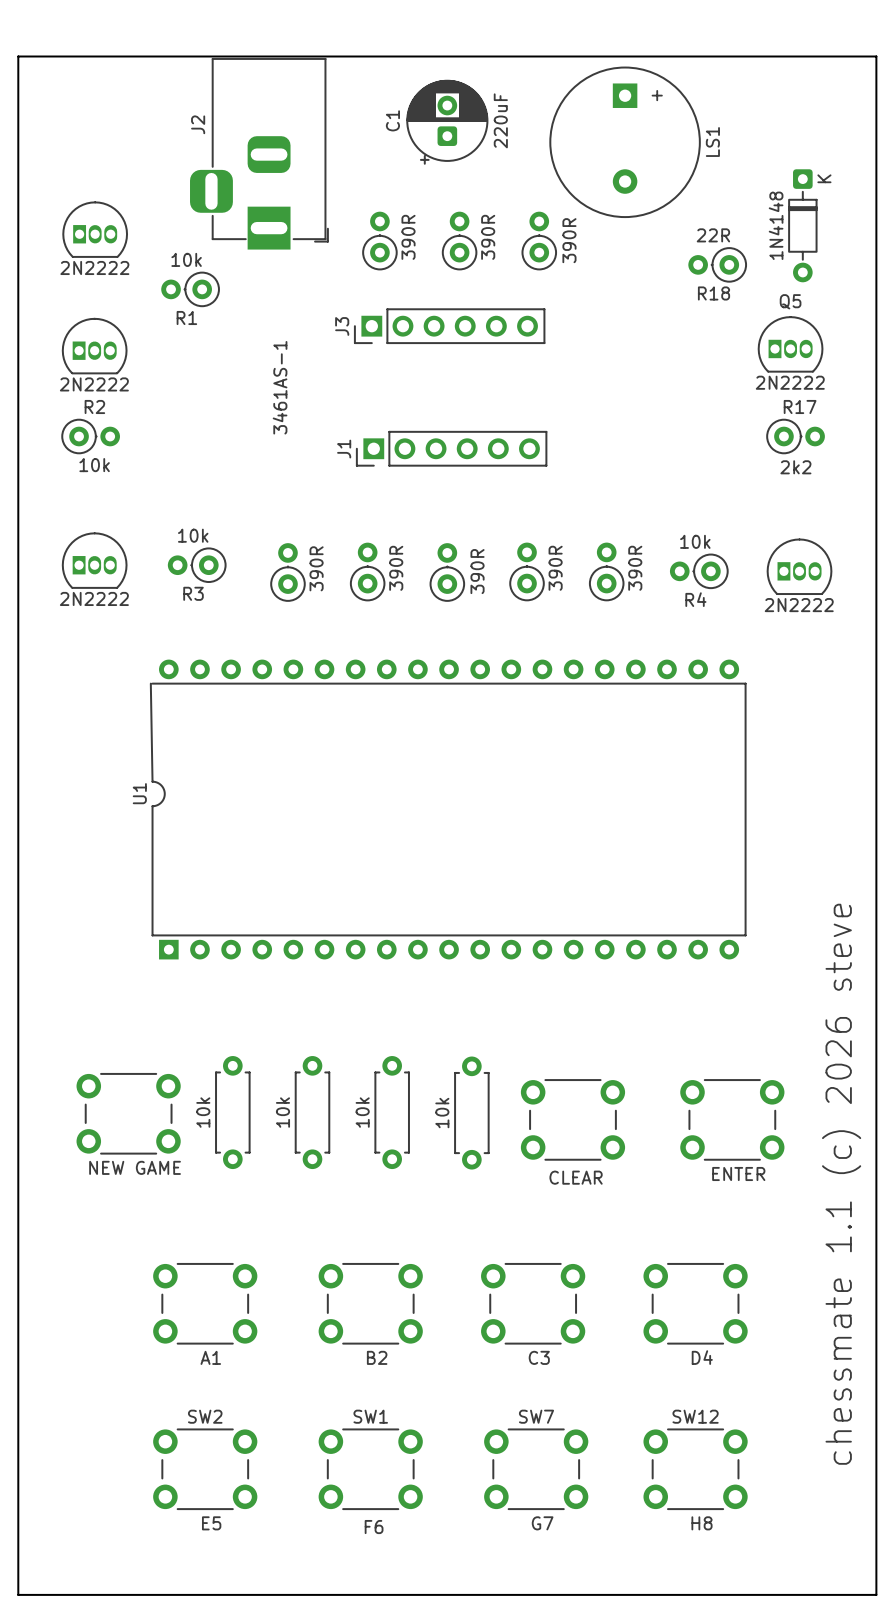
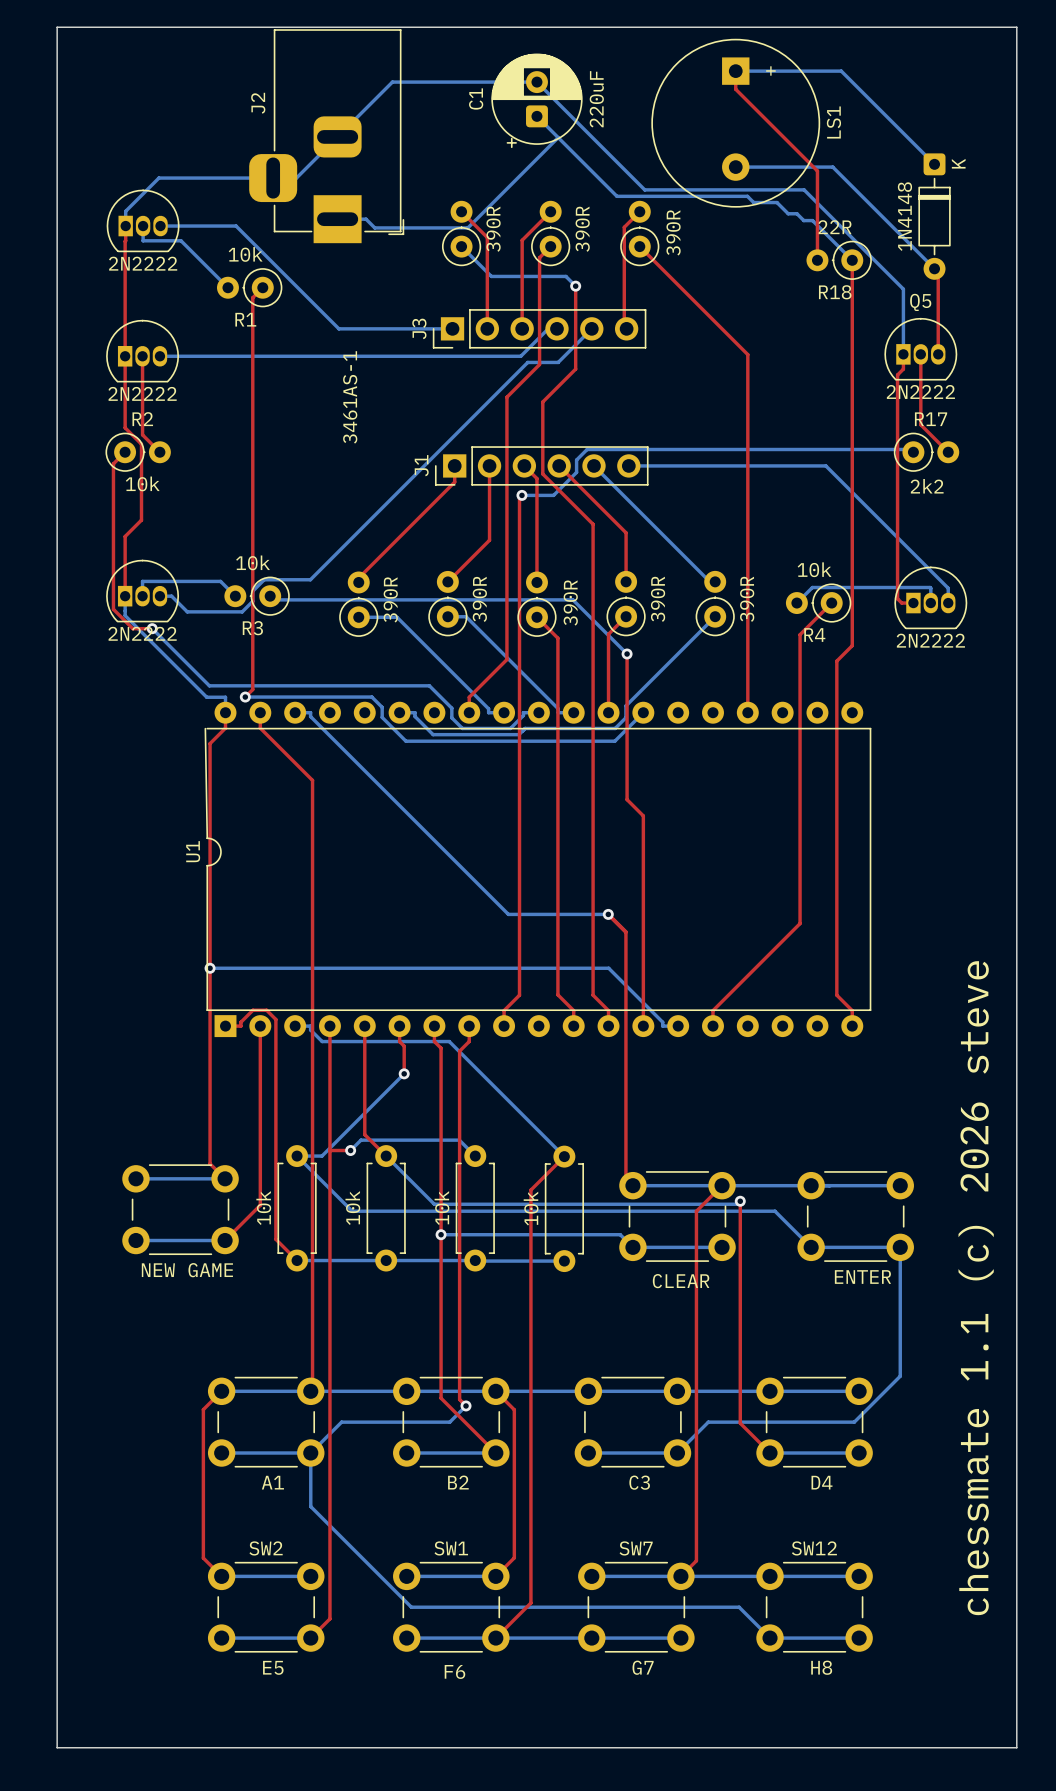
top track: none -> (735, 71) (735, 89) (817, 171) (817, 260)
bottom track: none -> (735, 71) (841, 71) (934, 164)
bottom track: none -> (536, 116) (616, 196) (747, 196) (753, 202) (777, 202) (788, 213) (796, 213) (803, 220) (812, 220) (852, 260)
bottom track: none -> (558, 137) (467, 227) (374, 227) (366, 219) (337, 219)
bottom track: none -> (735, 167) (832, 167) (934, 268)
top track: none -> (461, 211) (487, 237) (487, 328)
top track: none -> (550, 211) (522, 240) (522, 328)
top track: none -> (639, 211) (624, 227) (624, 326) (626, 328)
top track: none -> (125, 226) (125, 427) (141, 444) (141, 520) (125, 536) (125, 596)
bottom track: none -> (125, 226) (125, 211) (158, 178) (296, 178) (392, 82) (536, 82) (644, 189) (804, 189) (903, 289) (903, 354)
bottom track: none -> (143, 226) (143, 240) (181, 240) (227, 287)
bottom track: none -> (160, 226) (236, 226) (338, 328) (452, 328)
bottom track: none -> (461, 246) (491, 276) (565, 276) (575, 286)
top track: none -> (550, 246) (539, 257) (539, 364) (506, 397) (506, 659) (469, 697) (469, 712)
top track: none -> (639, 246) (747, 354) (747, 712)
top track: none -> (852, 260) (852, 645) (836, 661) (836, 995) (852, 1010) (852, 1026)
top track: none -> (934, 268) (938, 272) (938, 354)
top track: none -> (575, 286) (575, 369) (542, 401) (542, 474) (593, 524) (593, 995) (608, 1010) (608, 1026)
via: none -> (575, 286)
top track: none -> (262, 287) (252, 297) (252, 689) (245, 697)
bottom track: none -> (556, 328) (548, 328) (520, 356) (159, 356)
bottom track: none -> (591, 328) (558, 362) (527, 362) (310, 579) (264, 579) (252, 591) (252, 601) (242, 611) (187, 611) (171, 596) (159, 596)
top track: none -> (903, 354) (903, 369) (897, 374) (897, 598) (901, 603) (913, 603)
top track: none -> (920, 354) (920, 424) (948, 452)
top track: none -> (142, 356) (142, 434) (159, 452)
top track: none -> (125, 452) (113, 463) (113, 609) (132, 628) (152, 628)
bottom track: none -> (913, 452) (910, 449) (587, 449) (576, 460) (576, 472) (553, 495) (521, 495)
top track: none -> (454, 465) (454, 482) (358, 578) (358, 582)
top track: none -> (489, 465) (489, 540) (447, 581)
top track: none -> (524, 465) (536, 478) (536, 582)
top track: none -> (559, 465) (626, 532) (626, 581)
bottom track: none -> (594, 465) (709, 581) (715, 581)
bottom track: none -> (628, 465) (825, 465) (948, 588) (948, 603)
top track: none -> (521, 495) (519, 497) (519, 995) (504, 1010) (504, 1026)
via: none -> (521, 495)
bottom track: none -> (125, 596) (125, 615) (206, 697) (225, 697) (225, 712)
bottom track: none -> (142, 596) (142, 581) (220, 581) (235, 596)
bottom track: none -> (270, 596) (273, 599) (572, 599) (627, 654)
bottom track: none -> (796, 603) (812, 587) (930, 587) (930, 603)
top track: none -> (831, 603) (800, 634) (800, 923) (712, 1010) (712, 1026)
bottom track: none -> (447, 616) (466, 616) (558, 708) (558, 712) (573, 712)
top track: none -> (626, 616) (608, 634) (608, 712)
bottom track: none -> (715, 616) (625, 705) (625, 717) (615, 728) (525, 728) (518, 734) (433, 734) (415, 716) (415, 712) (399, 712)
bottom track: none -> (358, 617) (397, 617) (488, 708) (488, 712) (504, 712)
top track: none -> (536, 617) (557, 638) (557, 994) (573, 1010) (573, 1026)
bottom track: none -> (152, 628) (209, 685) (429, 685) (451, 708) (451, 717) (462, 728) (510, 728) (523, 715) (523, 712) (538, 712)
via: none -> (152, 628)
top track: none -> (627, 654) (627, 799) (643, 815) (643, 1026)
via: none -> (627, 654)
bottom track: none -> (246, 695) (245, 697) (371, 697) (382, 707) (382, 717) (405, 741) (614, 741) (643, 712)
via: none -> (245, 697)
top track: none -> (225, 712) (225, 728) (210, 743) (210, 1163) (225, 1178)
top track: none -> (260, 712) (260, 728) (312, 780) (312, 1389) (310, 1391)
bottom track: none -> (295, 712) (310, 712) (310, 716) (508, 914) (608, 914)
top track: none -> (608, 914) (625, 932) (625, 1178) (632, 1185)
via: none -> (608, 914)
bottom track: none -> (207, 968) (608, 968) (662, 1022) (662, 1026) (678, 1026)
via: none -> (210, 968)
top track: none -> (225, 1026) (240, 1026) (240, 1022) (252, 1010) (266, 1010) (275, 1019) (275, 1239) (297, 1260)
top track: none -> (260, 1026) (260, 1205) (225, 1240)
bottom track: none -> (295, 1026) (310, 1026) (310, 1029) (322, 1041) (449, 1041) (564, 1156)
top track: none -> (329, 1026) (329, 1618) (310, 1638)
top track: none -> (364, 1026) (364, 1134) (386, 1156)
top track: none -> (399, 1026) (399, 1041) (404, 1046) (404, 1073)
top track: none -> (434, 1026) (434, 1041) (441, 1048) (441, 1398) (495, 1453)
top track: none -> (469, 1026) (469, 1041) (459, 1051) (459, 1399) (466, 1405)
bottom track: none -> (404, 1073) (321, 1156) (297, 1156) (352, 1211) (775, 1211) (811, 1247) (900, 1247) (900, 1376) (854, 1422) (708, 1422) (677, 1453) (588, 1453)
via: none -> (404, 1073)
top track: none -> (329, 1150) (350, 1150)
bottom track: none -> (350, 1150) (360, 1140) (459, 1140) (475, 1156)
via: none -> (350, 1150)
bottom track: none -> (386, 1156) (434, 1204) (737, 1204) (740, 1201)
top track: none -> (564, 1156) (530, 1190) (530, 1602) (495, 1638)
bottom track: none -> (135, 1178) (225, 1178)
bottom track: none -> (632, 1185) (900, 1185)
top track: none -> (722, 1185) (696, 1211) (696, 1560) (680, 1576)
top track: none -> (740, 1201) (740, 1423) (770, 1453)
via: none -> (740, 1201)
bottom track: none -> (441, 1234) (620, 1234) (632, 1247) (722, 1247)
via: none -> (441, 1234)
bottom track: none -> (135, 1240) (225, 1240)
bottom track: none -> (297, 1260) (564, 1261)
top track: none -> (221, 1391) (203, 1409) (203, 1558) (221, 1576)
bottom track: none -> (221, 1391) (859, 1391)
top track: none -> (495, 1391) (514, 1409) (514, 1557) (495, 1576)
bottom track: none -> (461, 1401) (466, 1405) (449, 1422) (341, 1422) (310, 1453)
via: none -> (466, 1405)
bottom track: none -> (221, 1453) (310, 1453)
bottom track: none -> (310, 1453) (310, 1506) (411, 1607) (739, 1607) (770, 1638) (859, 1638)
bottom track: none -> (406, 1453) (495, 1453)
bottom track: none -> (770, 1453) (859, 1453)
bottom track: none -> (221, 1576) (310, 1576)
bottom track: none -> (406, 1576) (495, 1576)
bottom track: none -> (591, 1576) (859, 1576)
bottom track: none -> (221, 1638) (310, 1638)
bottom track: none -> (406, 1638) (680, 1638)

